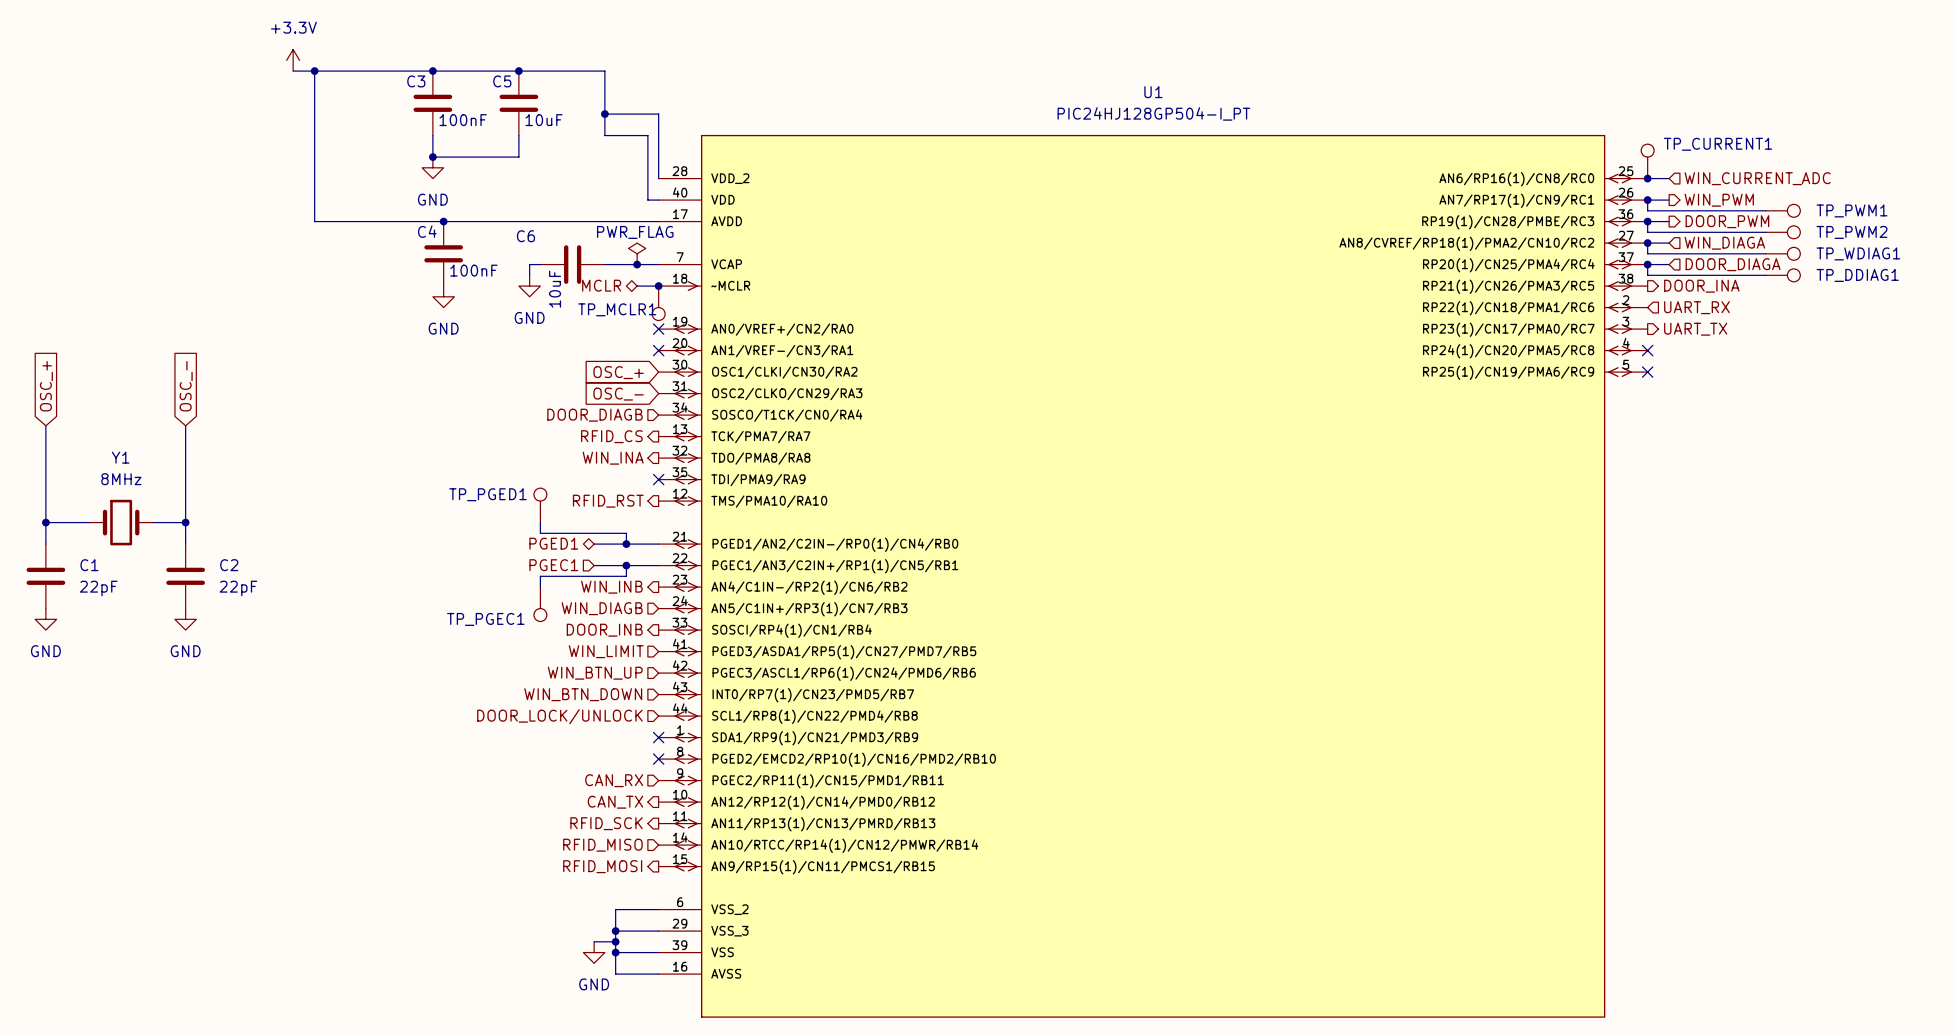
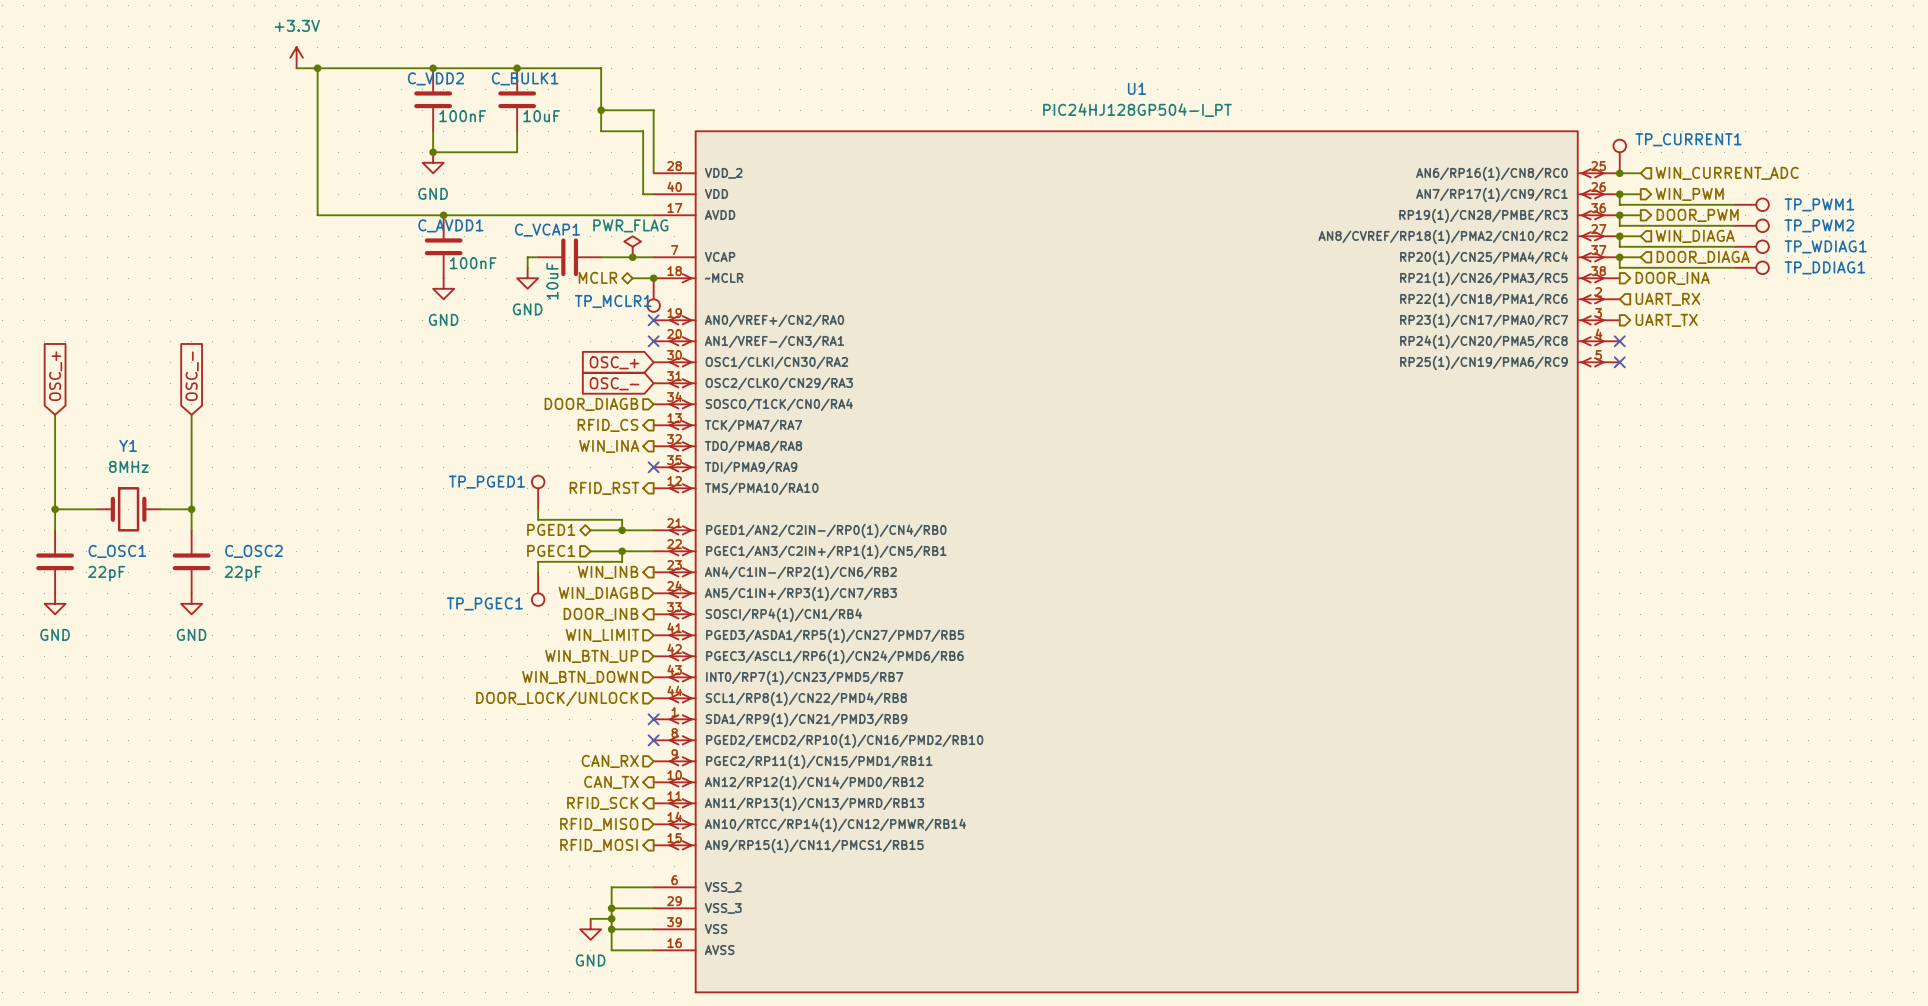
C3 name: C3 (416, 81) -> C_VDD2 (435, 78)
C5 name: C5 (502, 81) -> C_BULK1 (525, 78)
C4 name: C4 (427, 231) -> C_AVDD1 (450, 225)
C6 name: C6 (525, 236) -> C_VCAP1 (547, 230)
C1 name: C1 (89, 565) -> C_OSC1 (117, 551)
C2 name: C2 (229, 565) -> C_OSC2 (253, 551)

